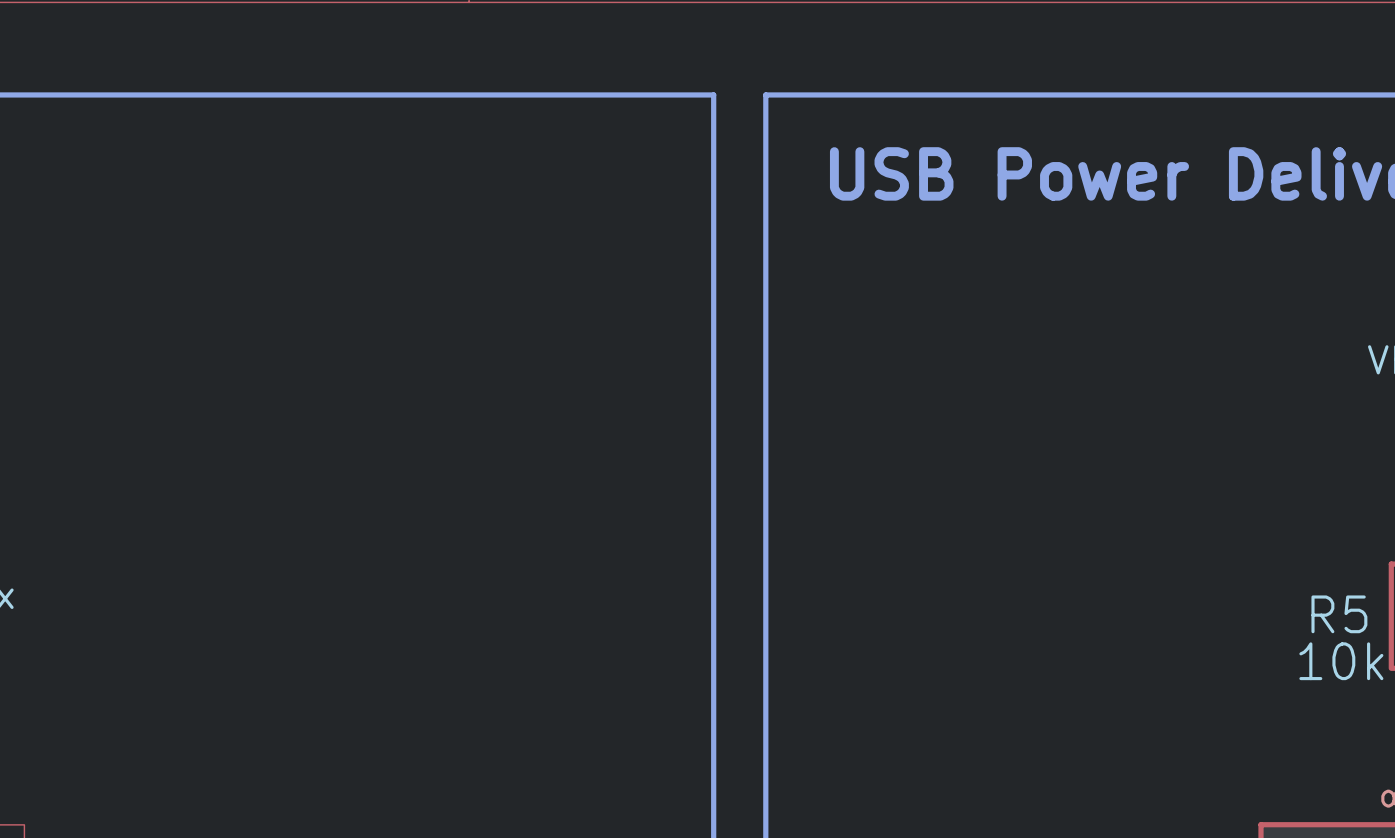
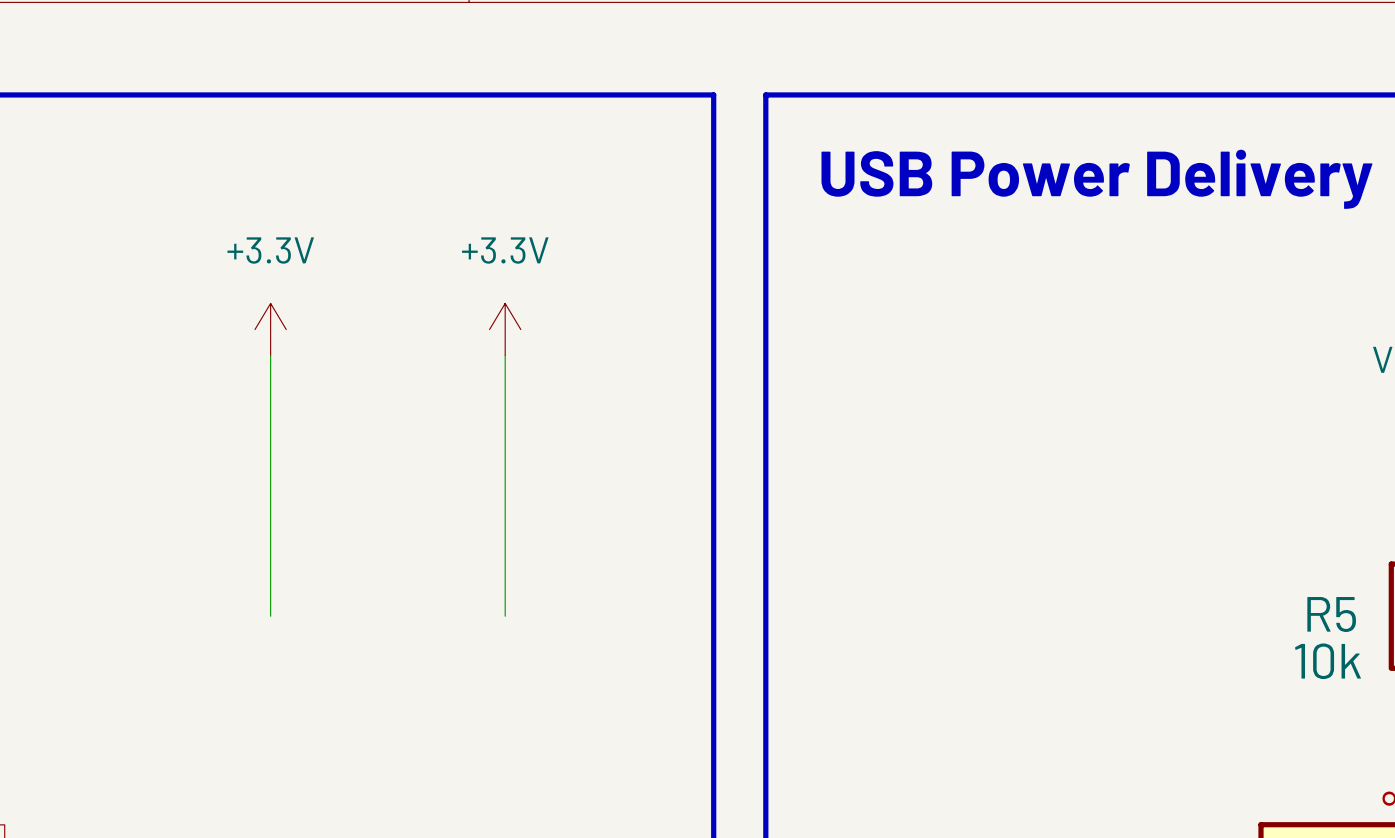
power symbol: none -> +3.3V (270, 329)
power symbol: none -> +3.3V (505, 329)
wire: none -> (270, 355) (270, 616)
wire: none -> (505, 355) (505, 616)

